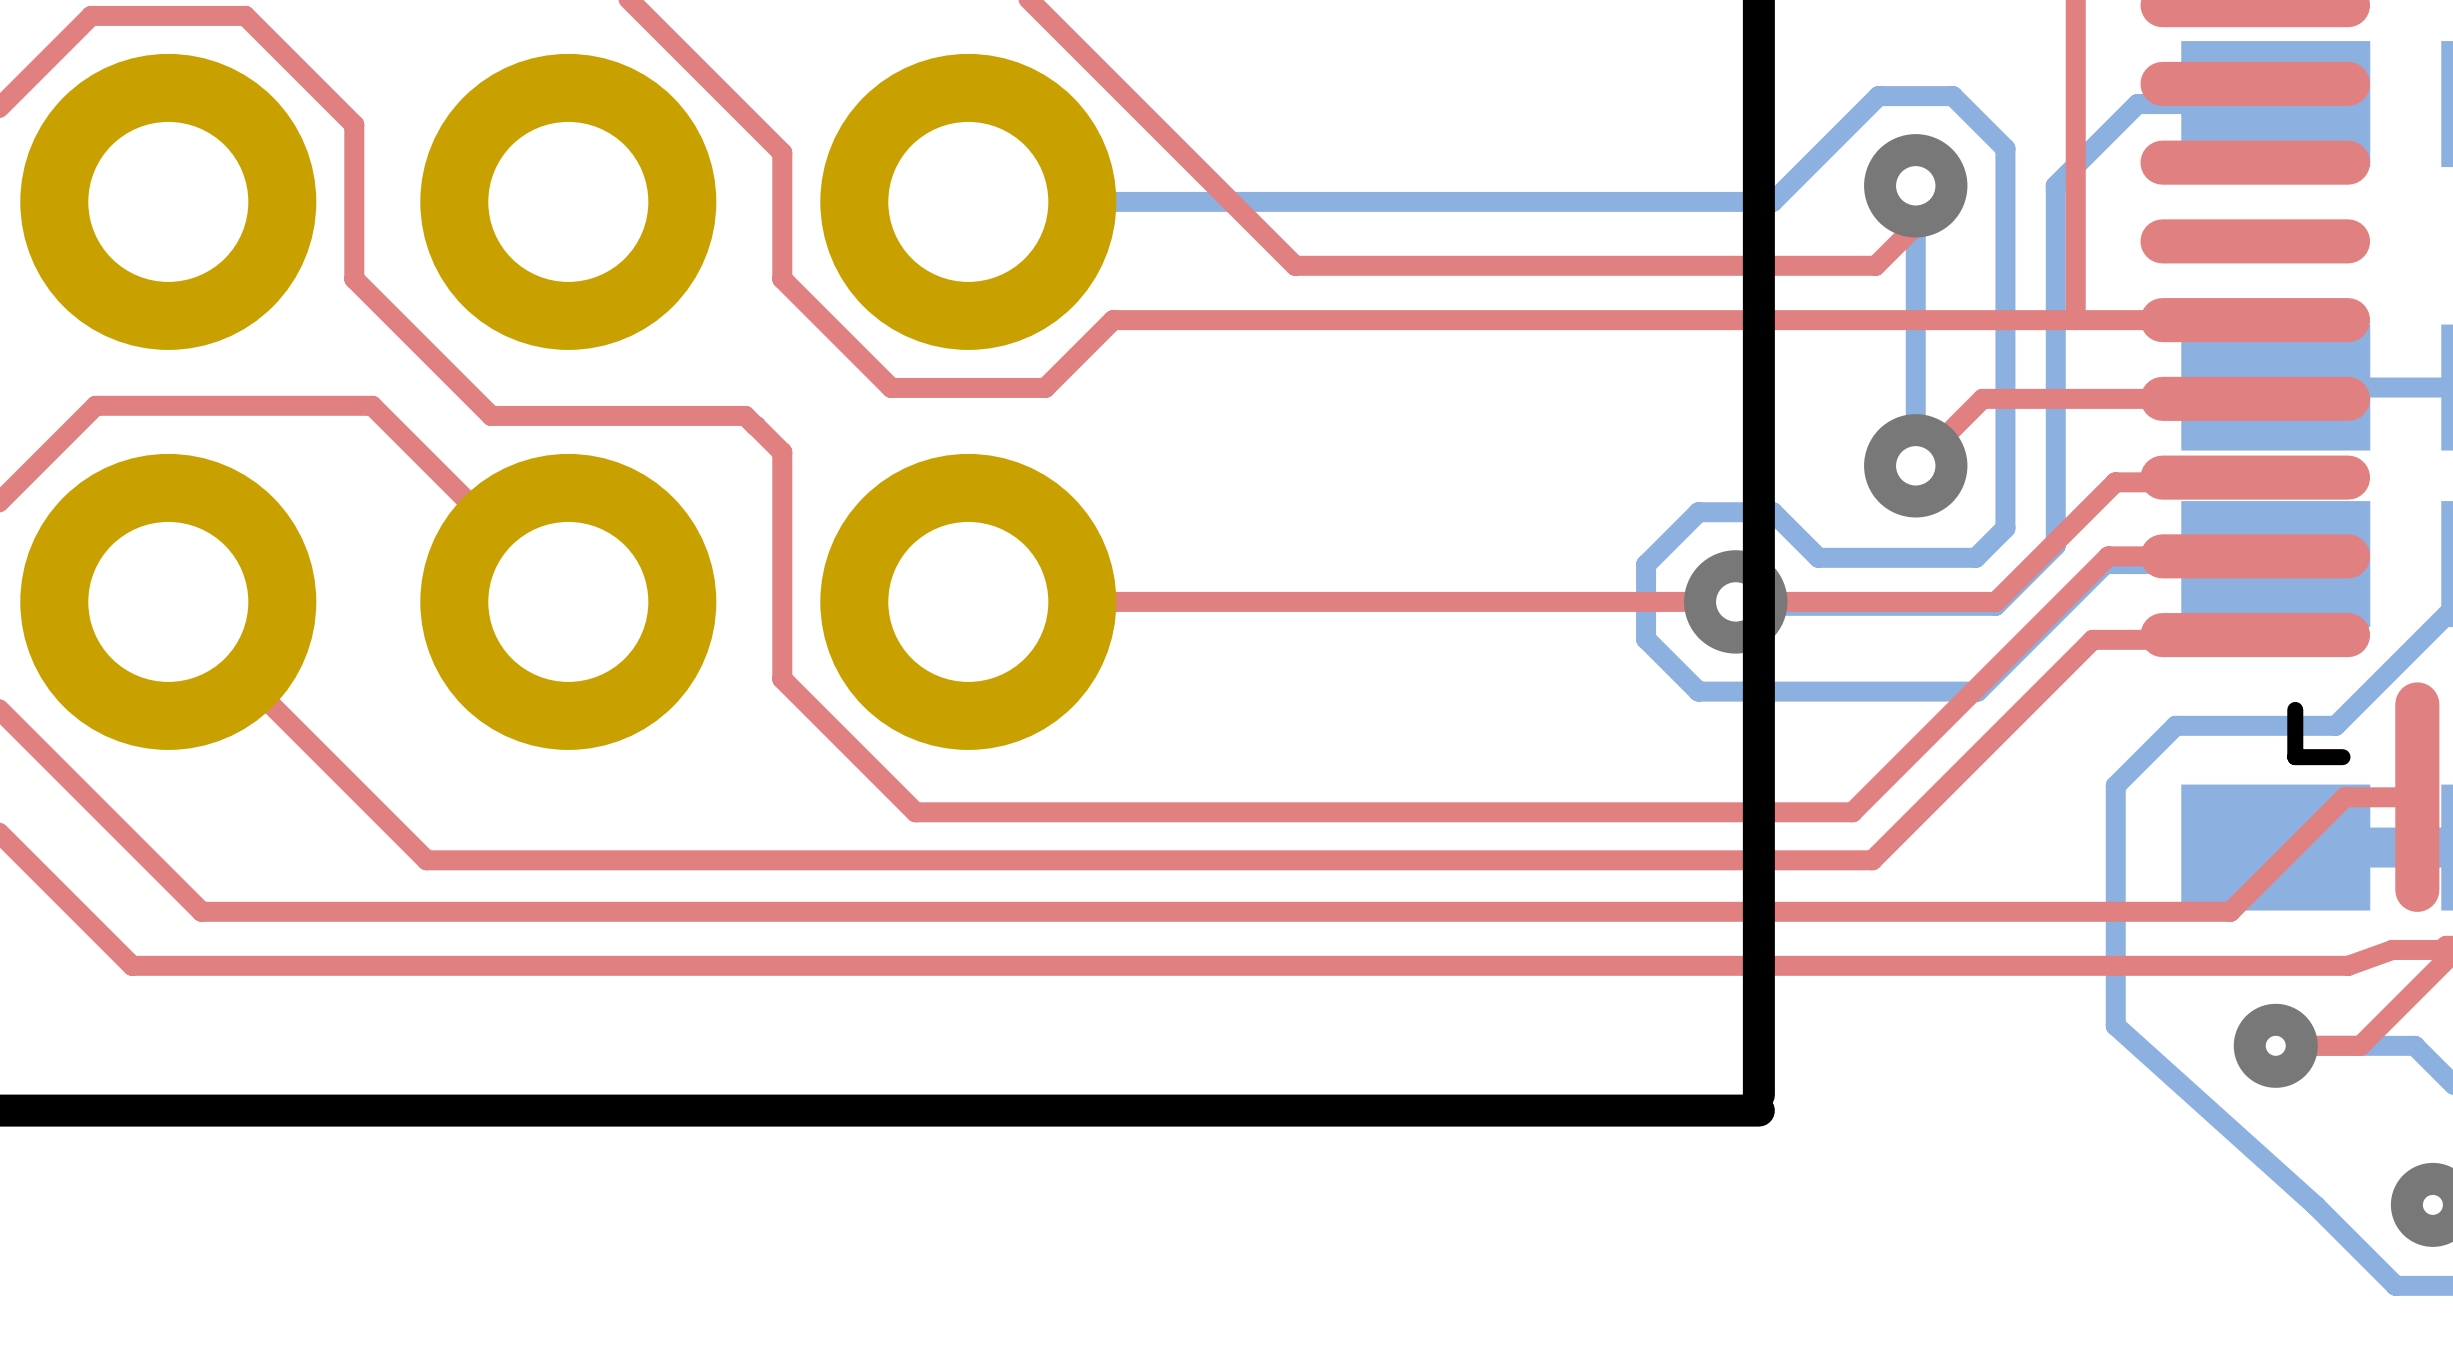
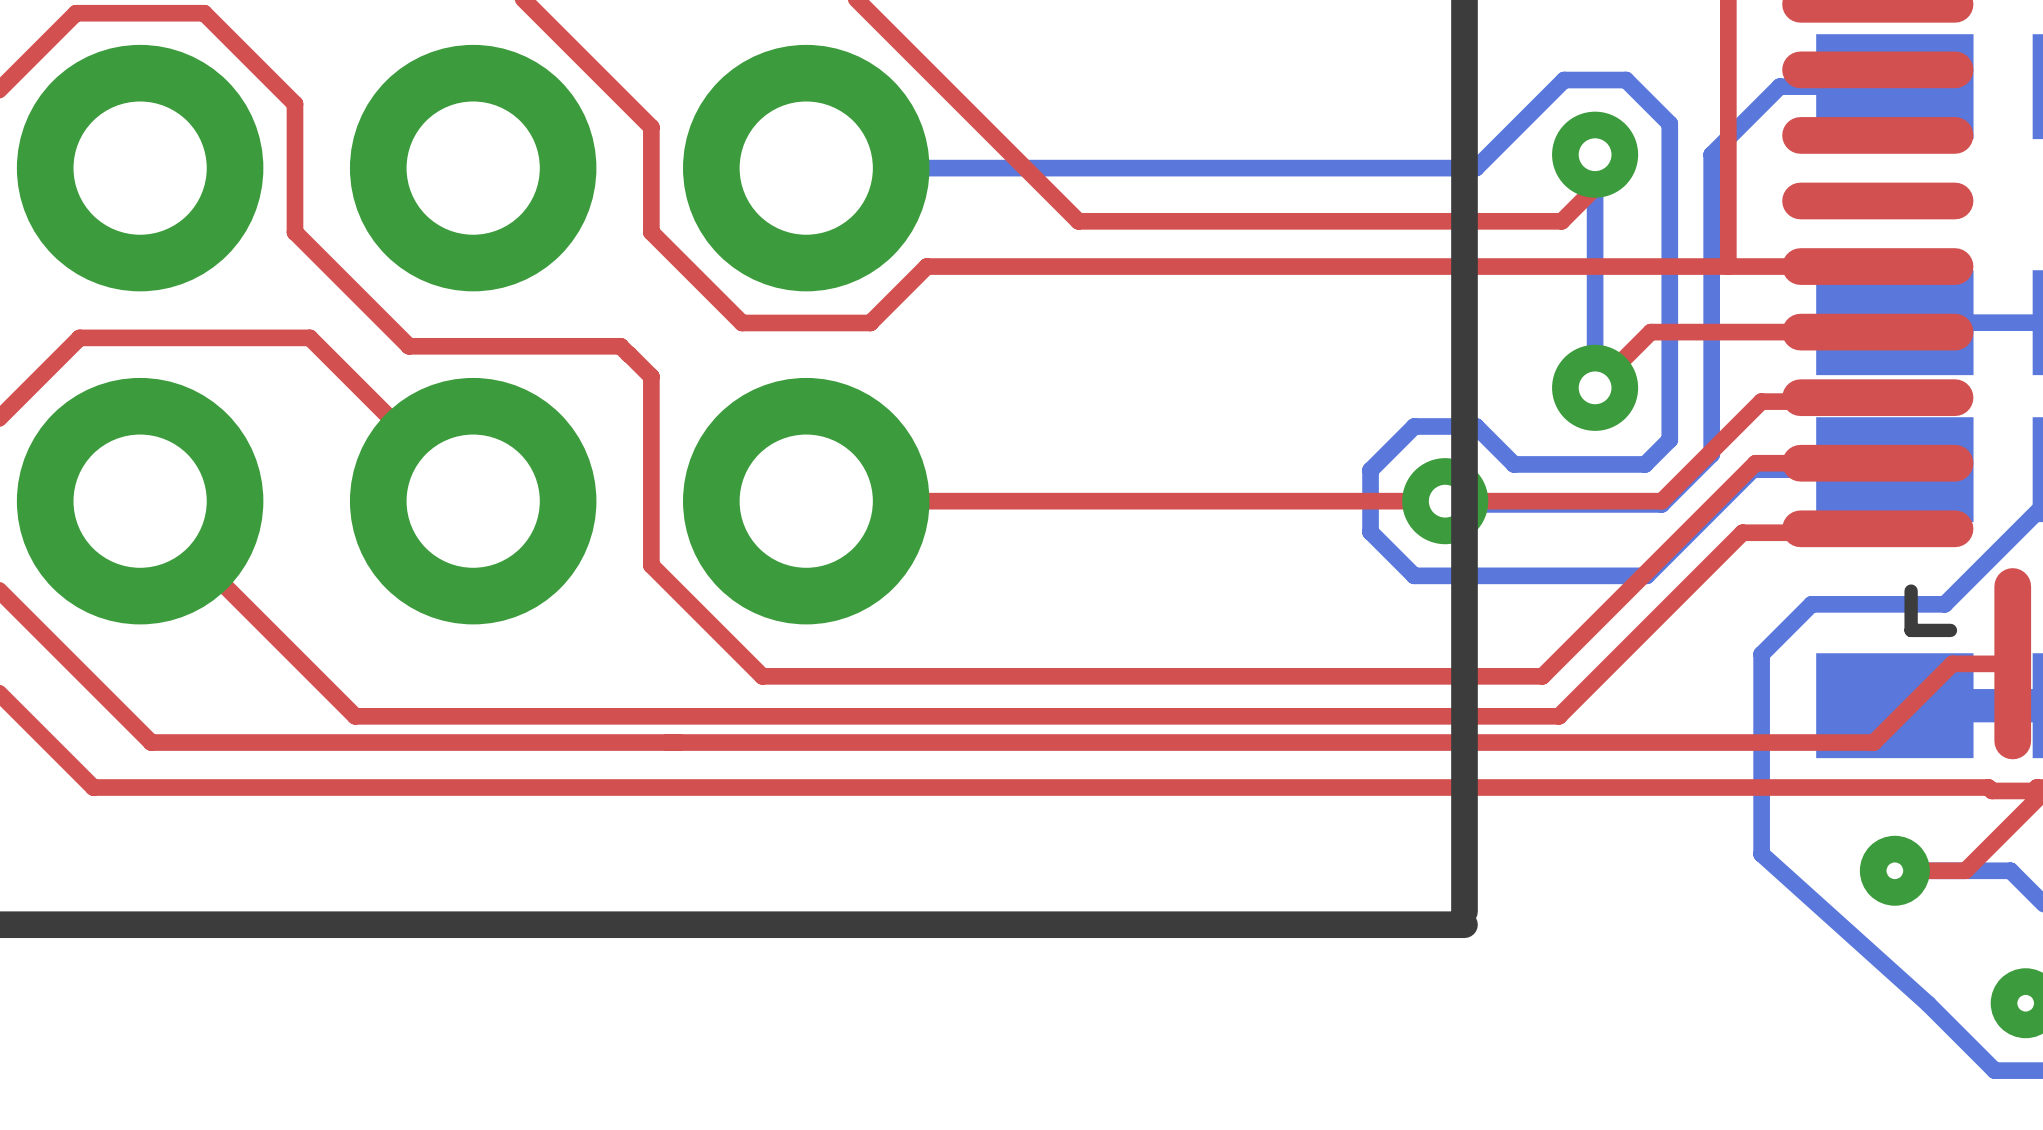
top track: (181, 891) (201, 911) (2230, 911) (2250, 891) -> (151, 742) (1873, 742)
top track: (112, 945) (132, 965) (2348, 965) (2392, 949) -> (93, 787) (1988, 787) (1992, 790)

